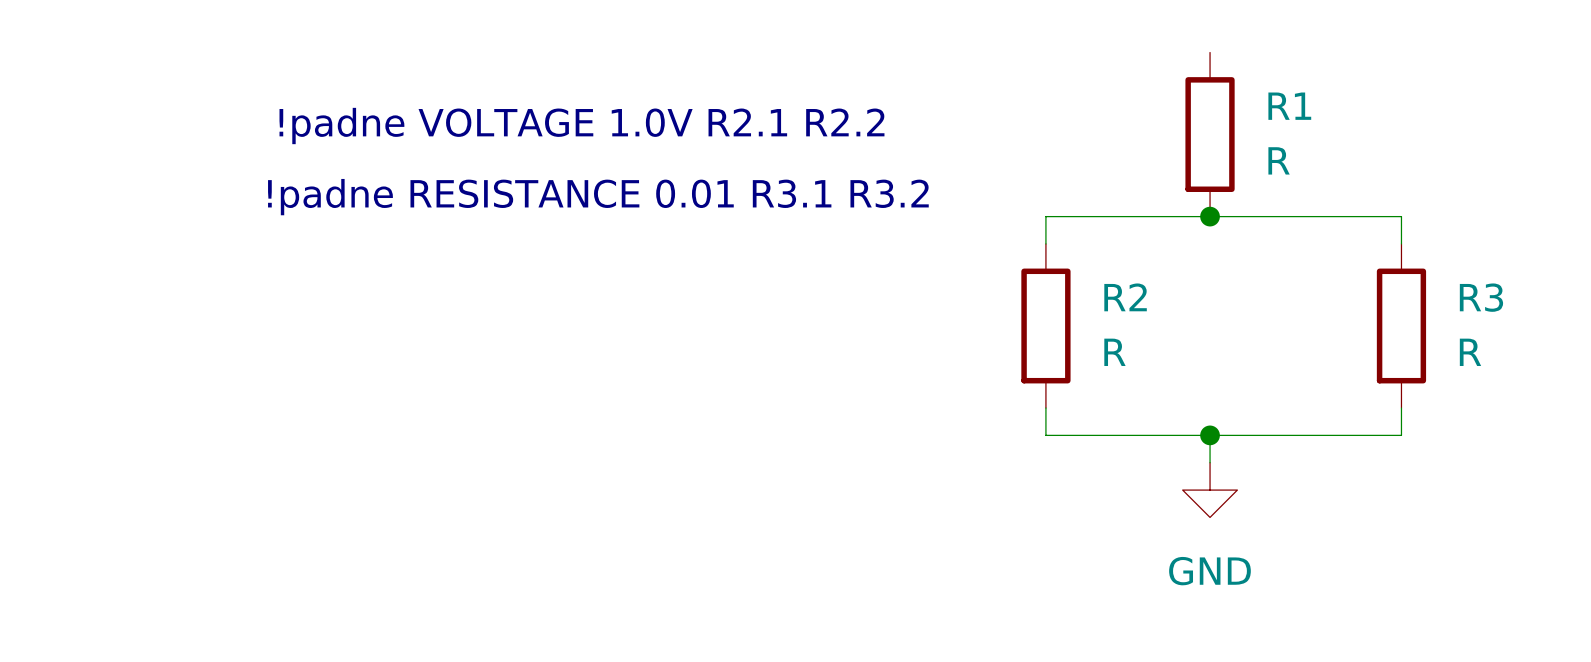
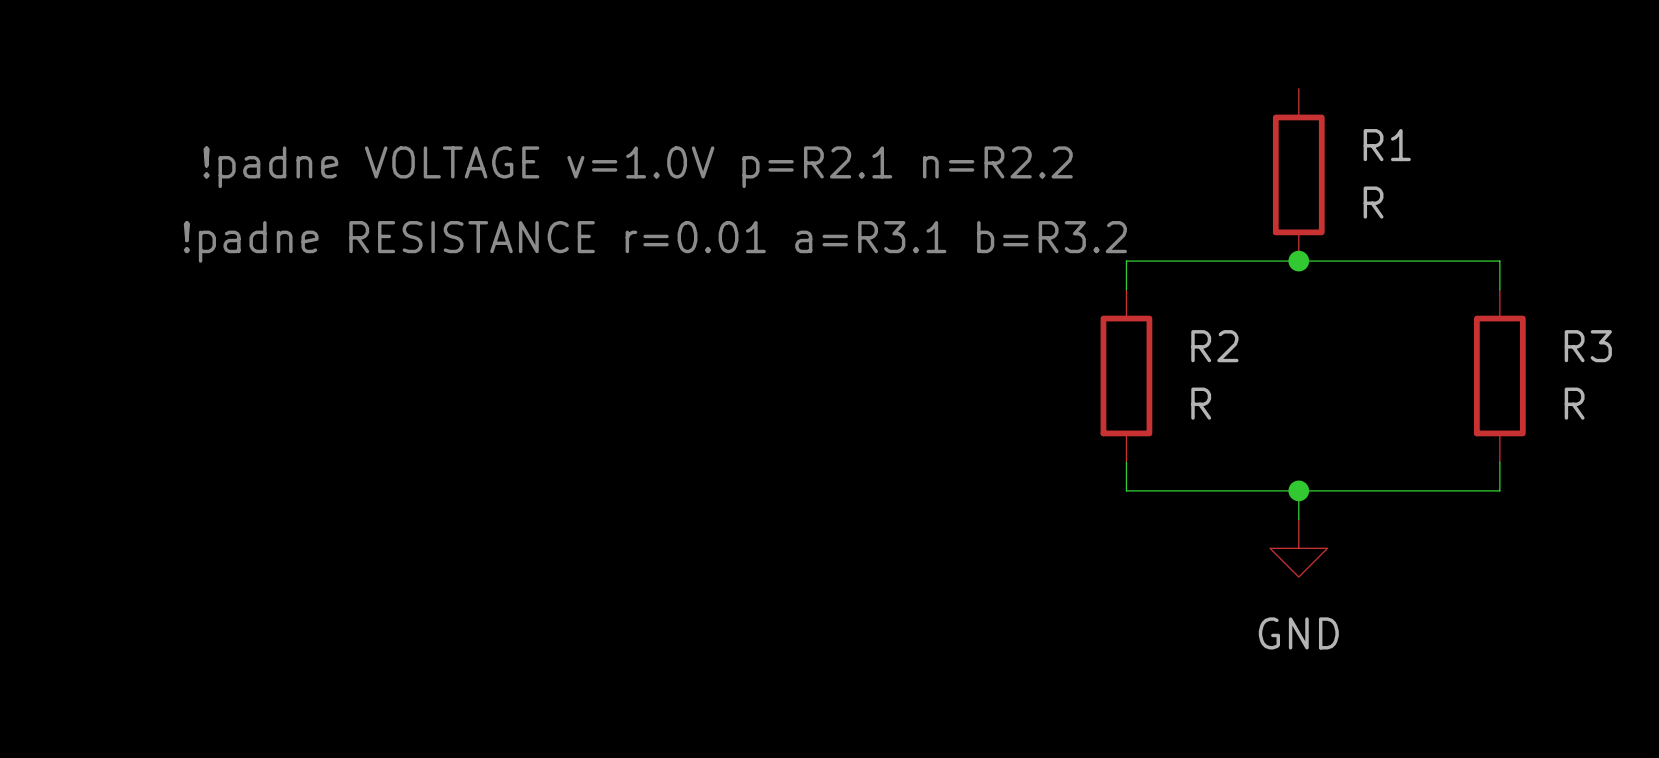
text: !padne VOLTAGE 1.0V R2.1 R2.2 (581, 126) -> !padne VOLTAGE v=1.0V p=R2.1 n=R2.2 (638, 167)
text: !padne RESISTANCE 0.01 R3.1 R3.2 (598, 197) -> !padne RESISTANCE r=0.01 a=R3.1 b=R3.2 (655, 241)

